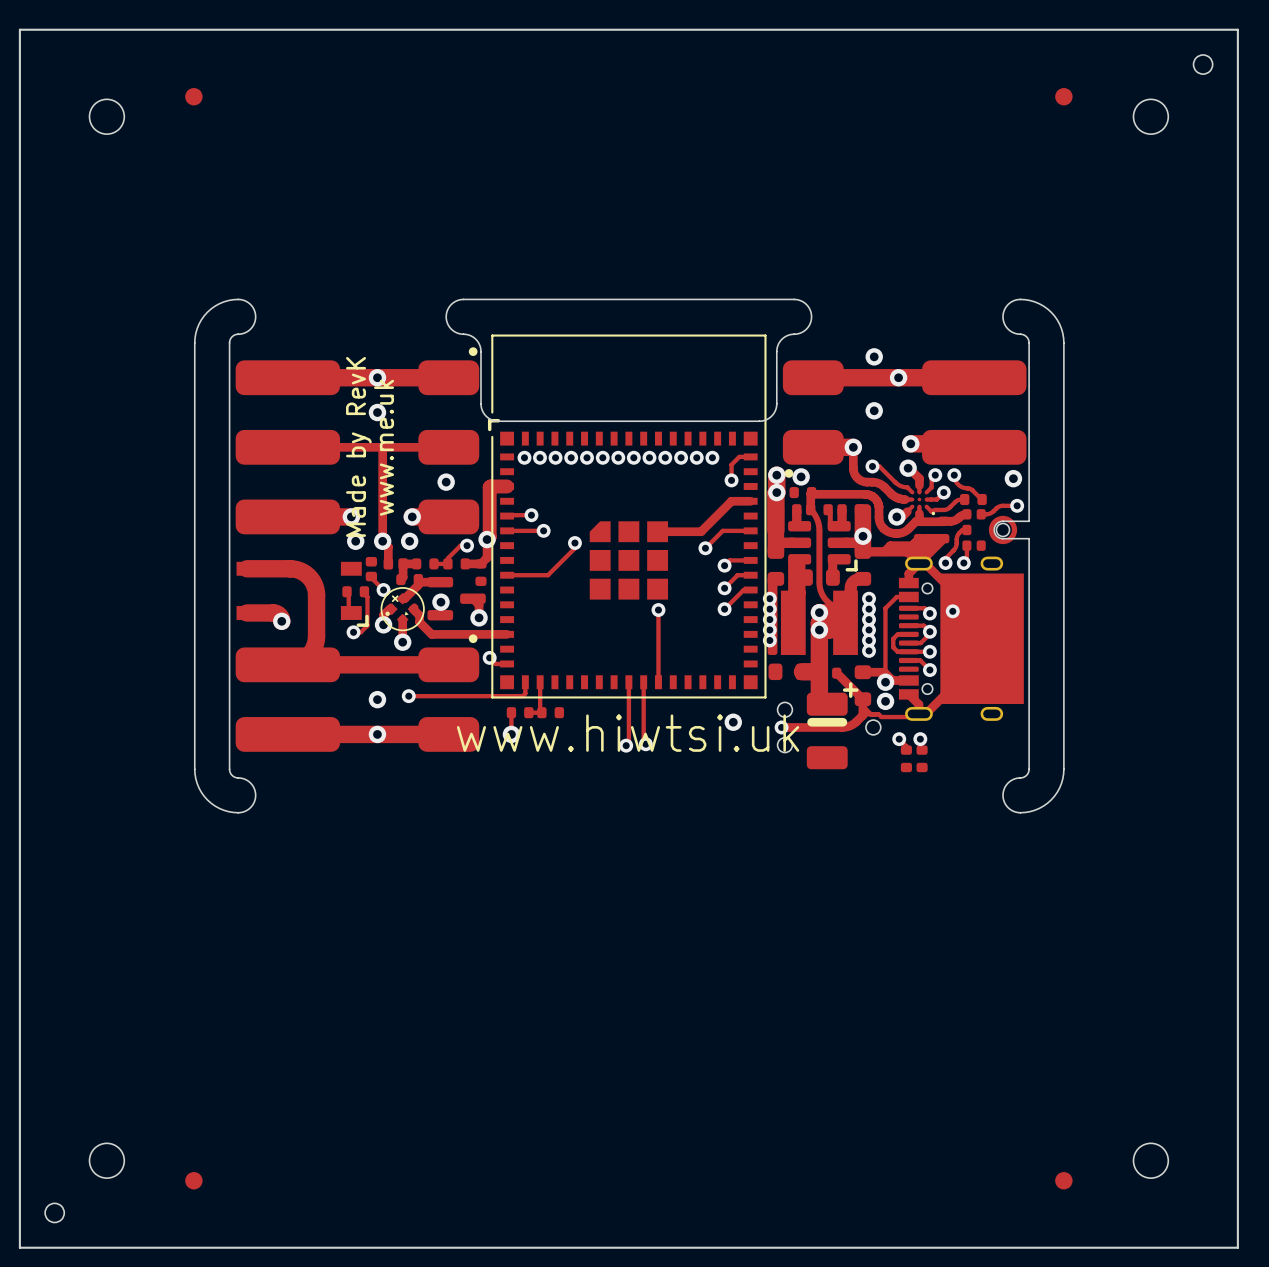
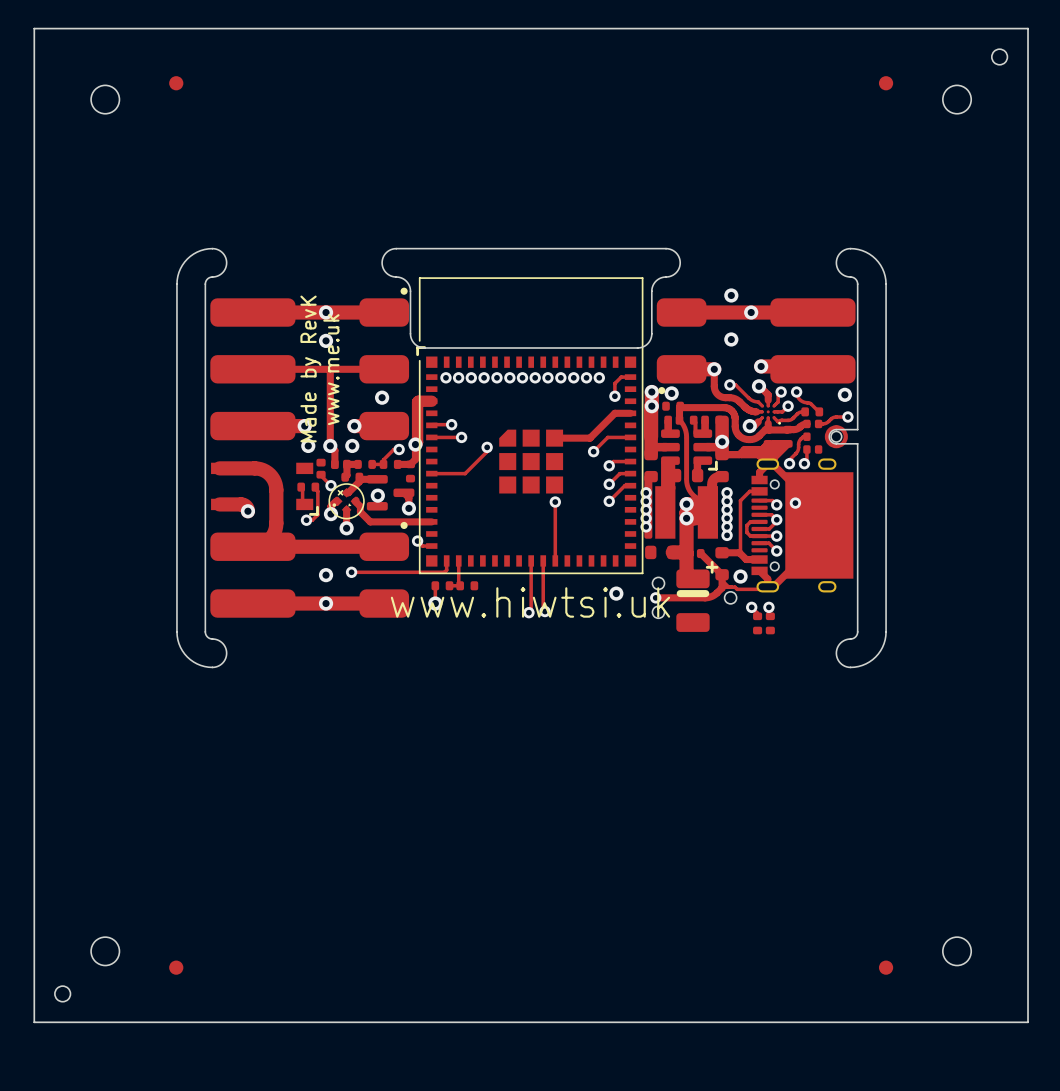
via: (885, 682) -> none

